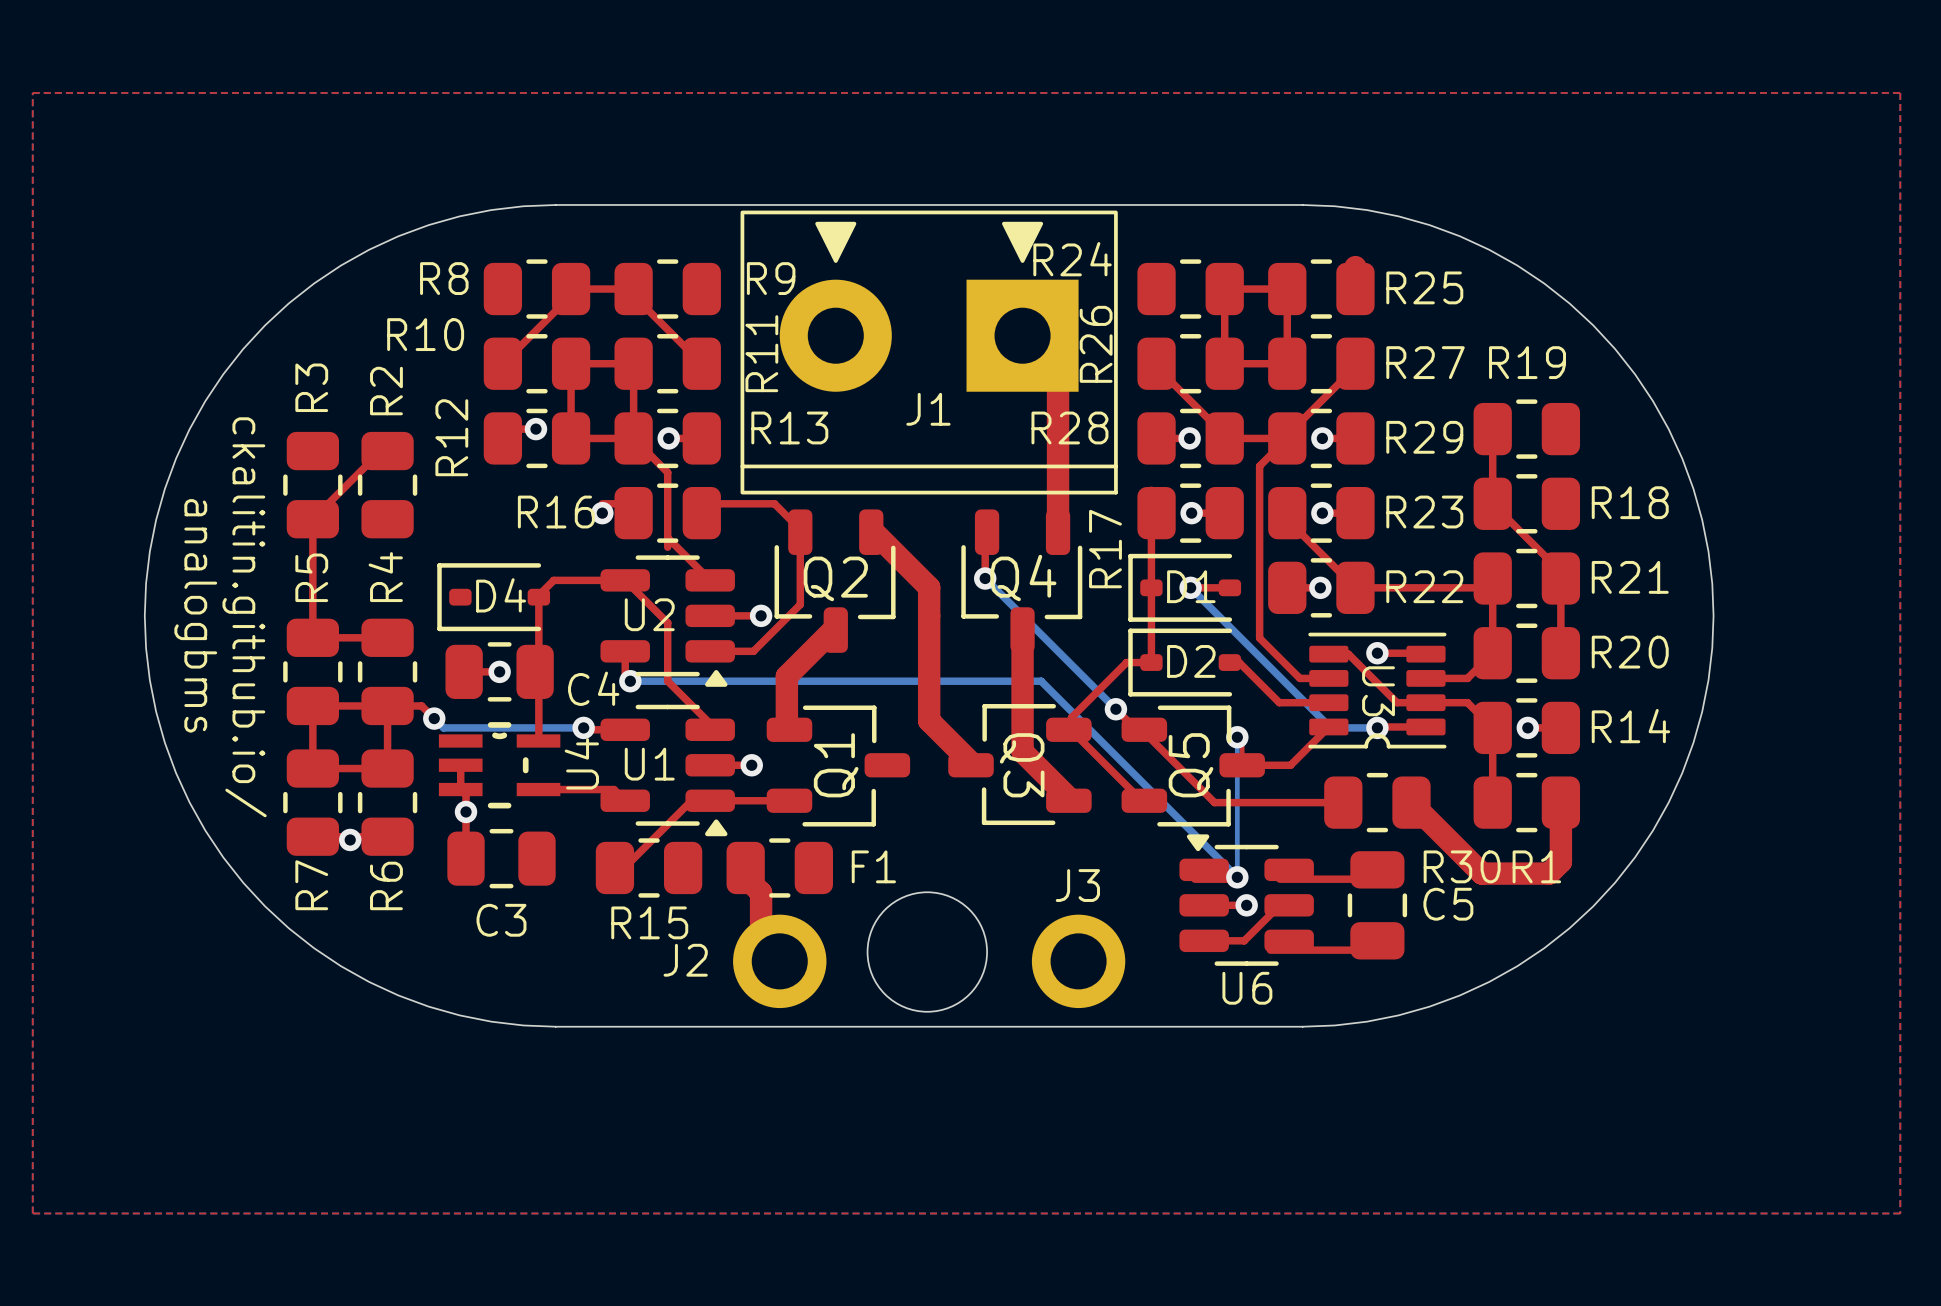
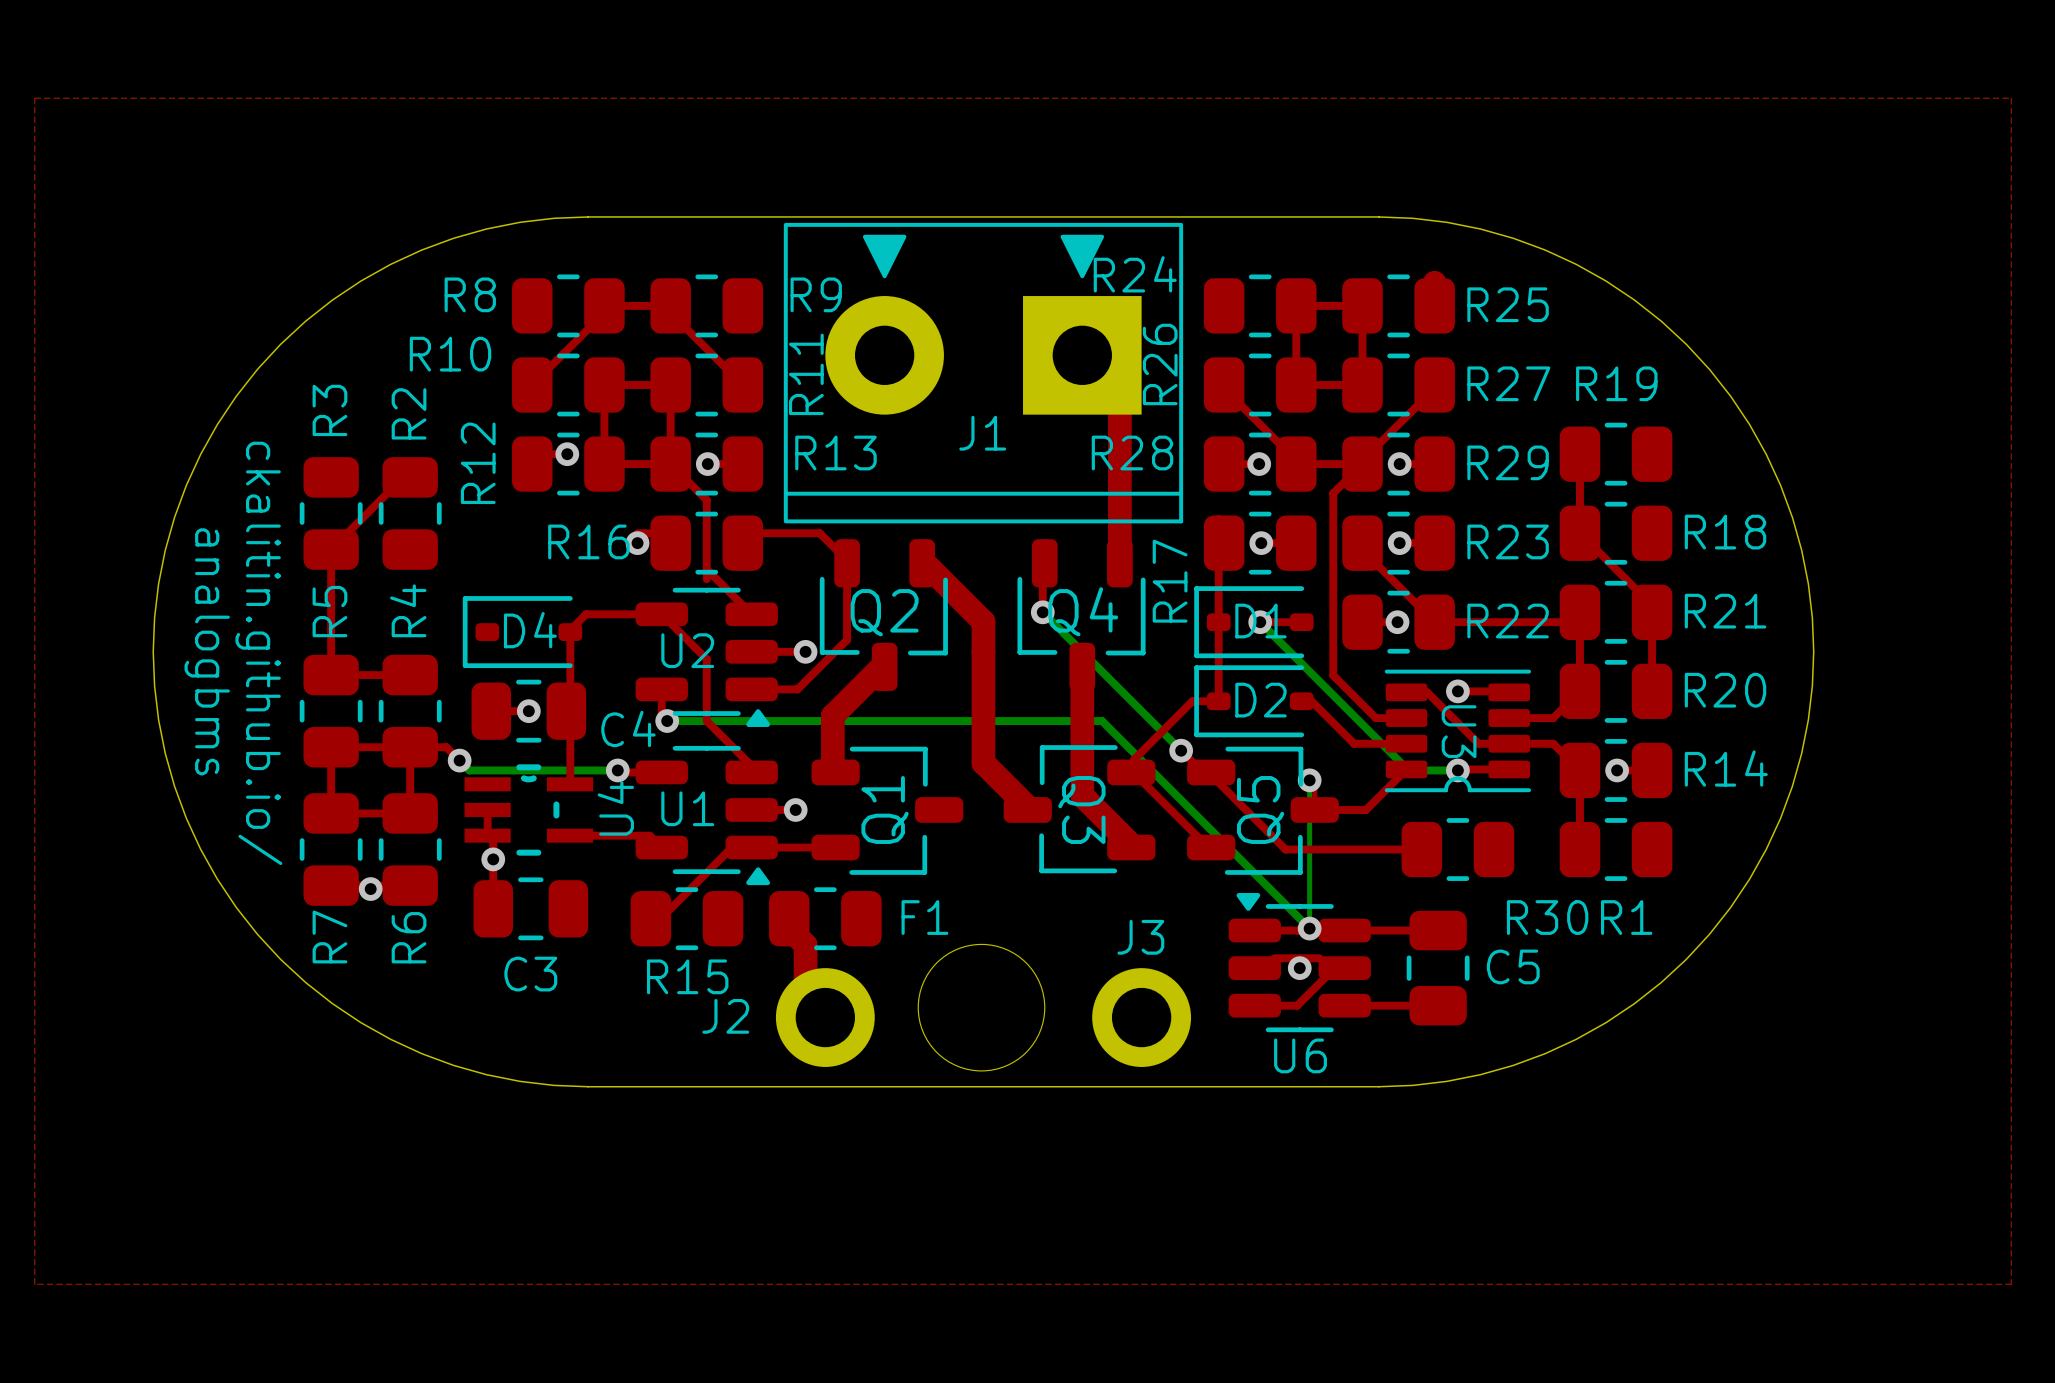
top track: (1560, 802) (1560, 861) (1549, 873) (1481, 873) (1411, 803) -> none
U6 position: (1246, 900) -> (1299, 962)
via position: (1246, 905) -> (1299, 968)
top track: (1289, 905) (1279, 905) (1244, 940) (1204, 940) -> (1344, 968) (1334, 968) (1297, 1005) (1254, 1005)
C5 position: (1377, 905) -> (1438, 968)

